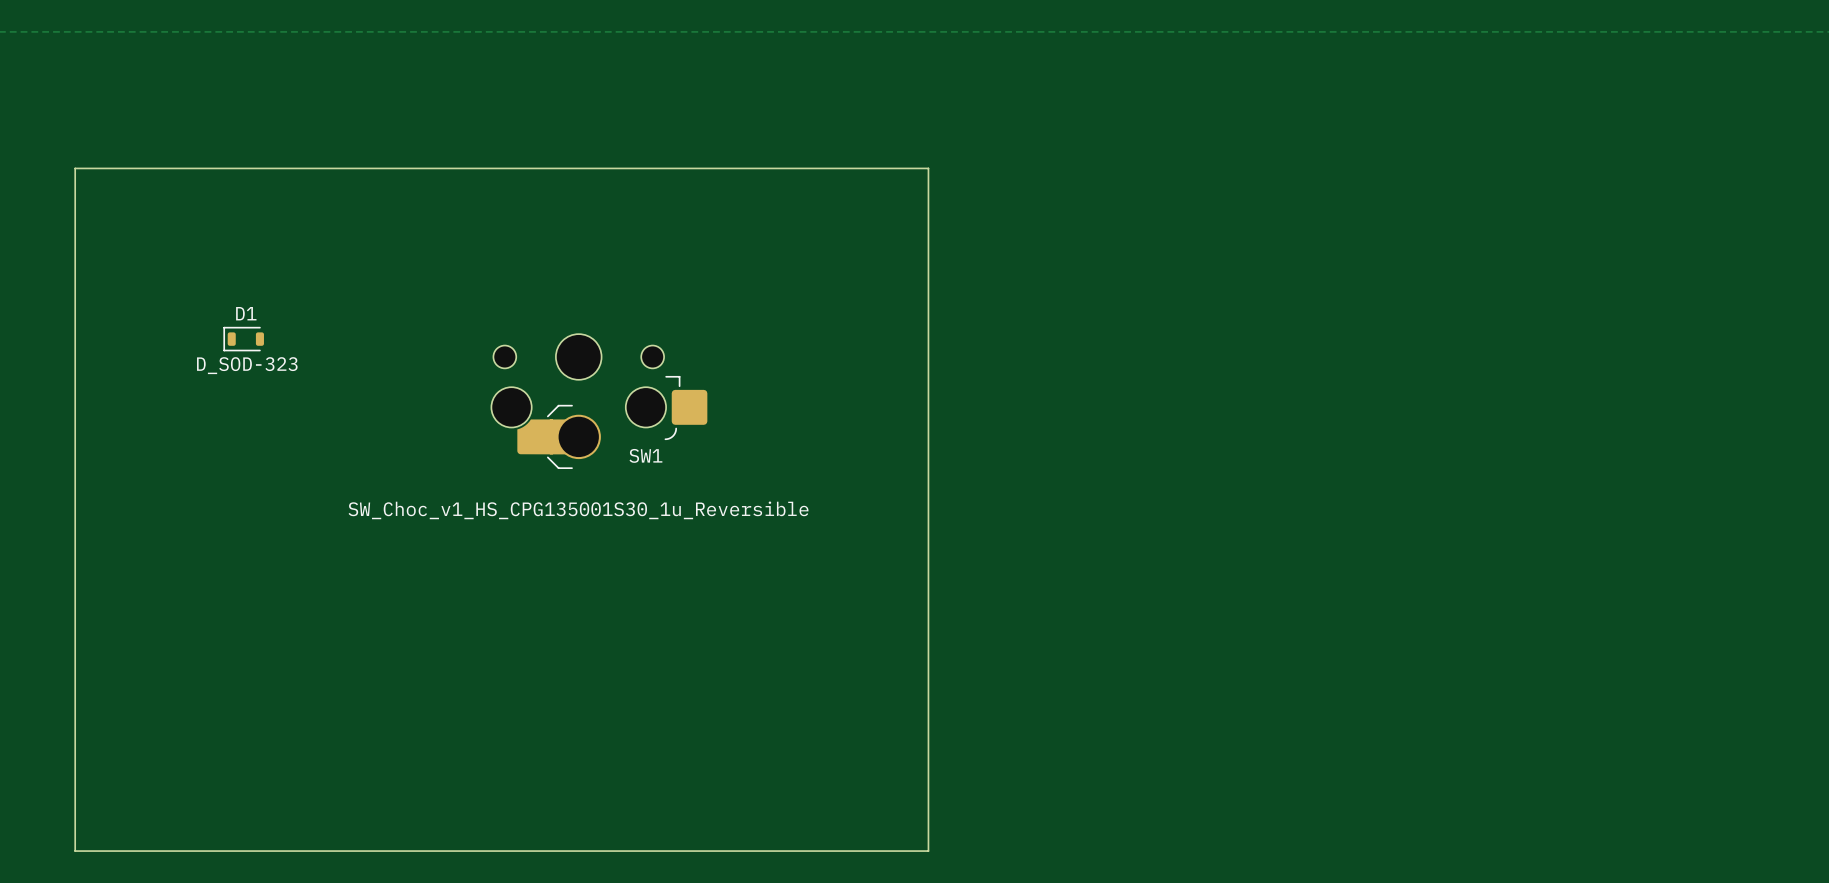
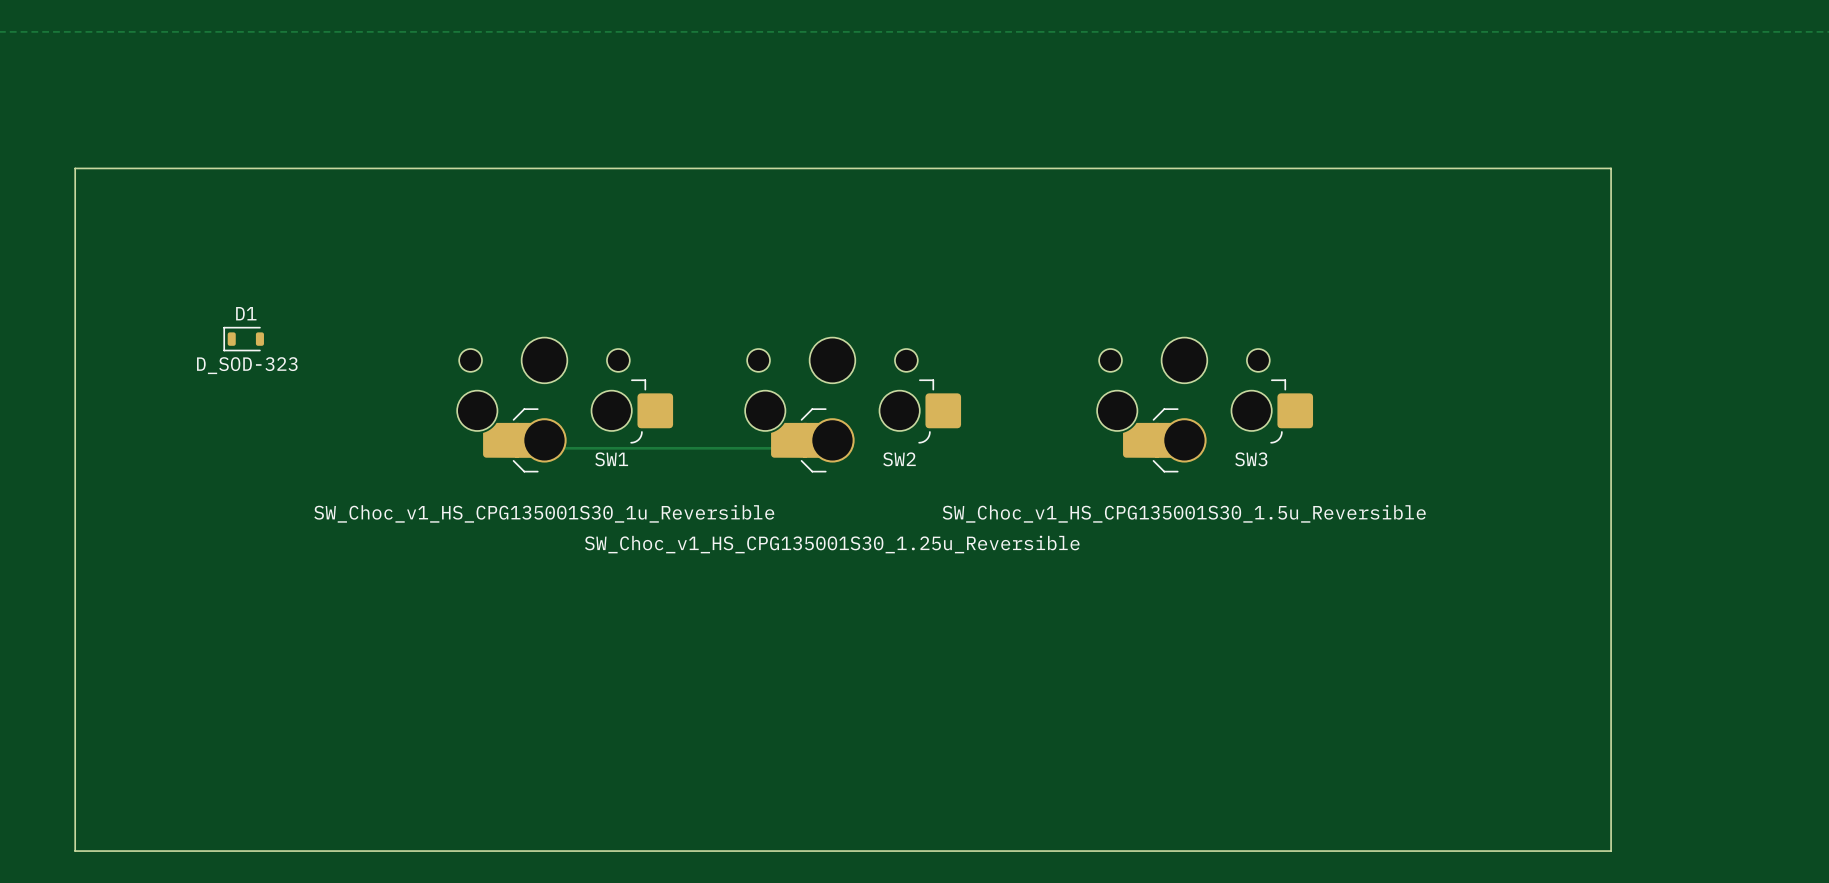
board edge: (928, 168) (928, 851) -> (928, 168) (1611, 168) (1611, 851) (928, 851)
SW1 position: (599, 401) -> (565, 405)
SW2: none -> SW_Choc_v1_HS_CPG135001S30_1.25u_Reversible (853, 405)
SW3: none -> SW_Choc_v1_HS_CPG135001S30_1.5u_Reversible (1205, 405)
track: none -> (544, 440) (552, 448) (824, 448) (832, 440)

